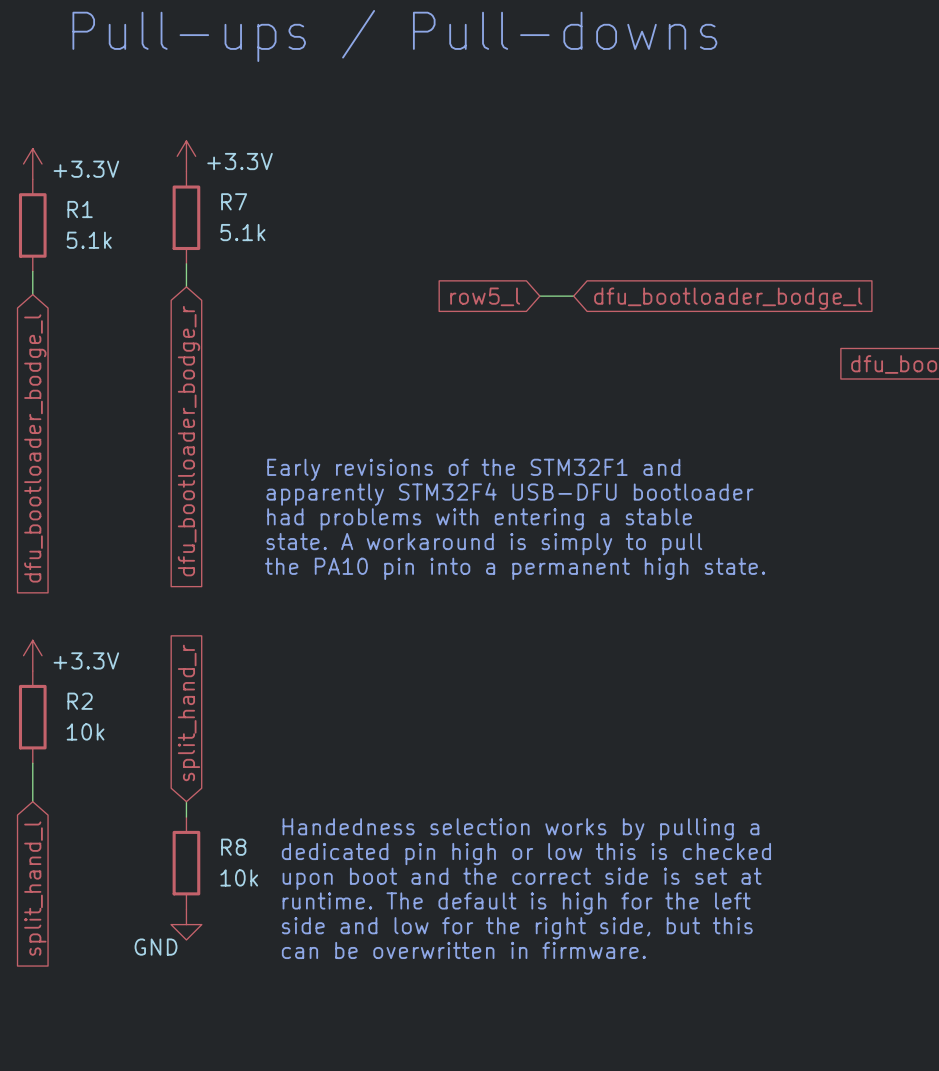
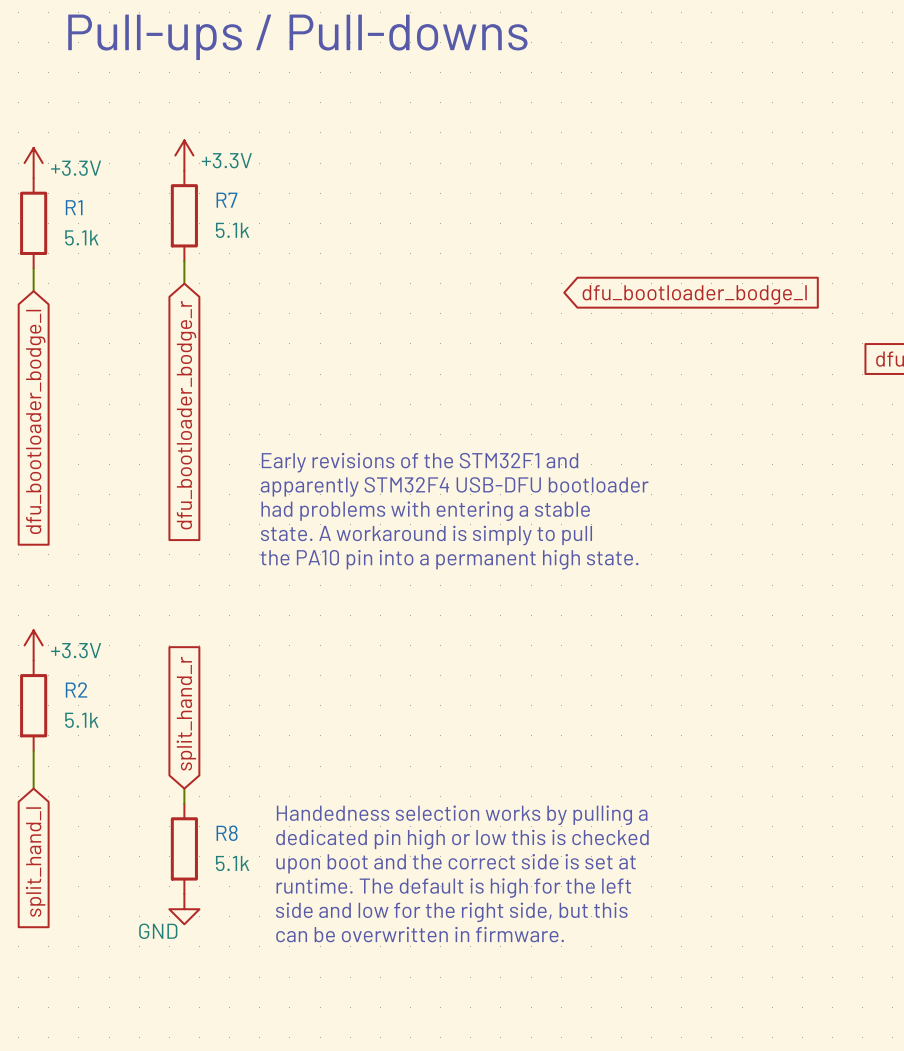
global label: row5_l (485, 296) -> none
wire: (539, 296) (573, 296) -> none
R2 value: 10k (85, 731) -> 5.1k (81, 720)
R8 value: 10k (239, 877) -> 5.1k (232, 863)

